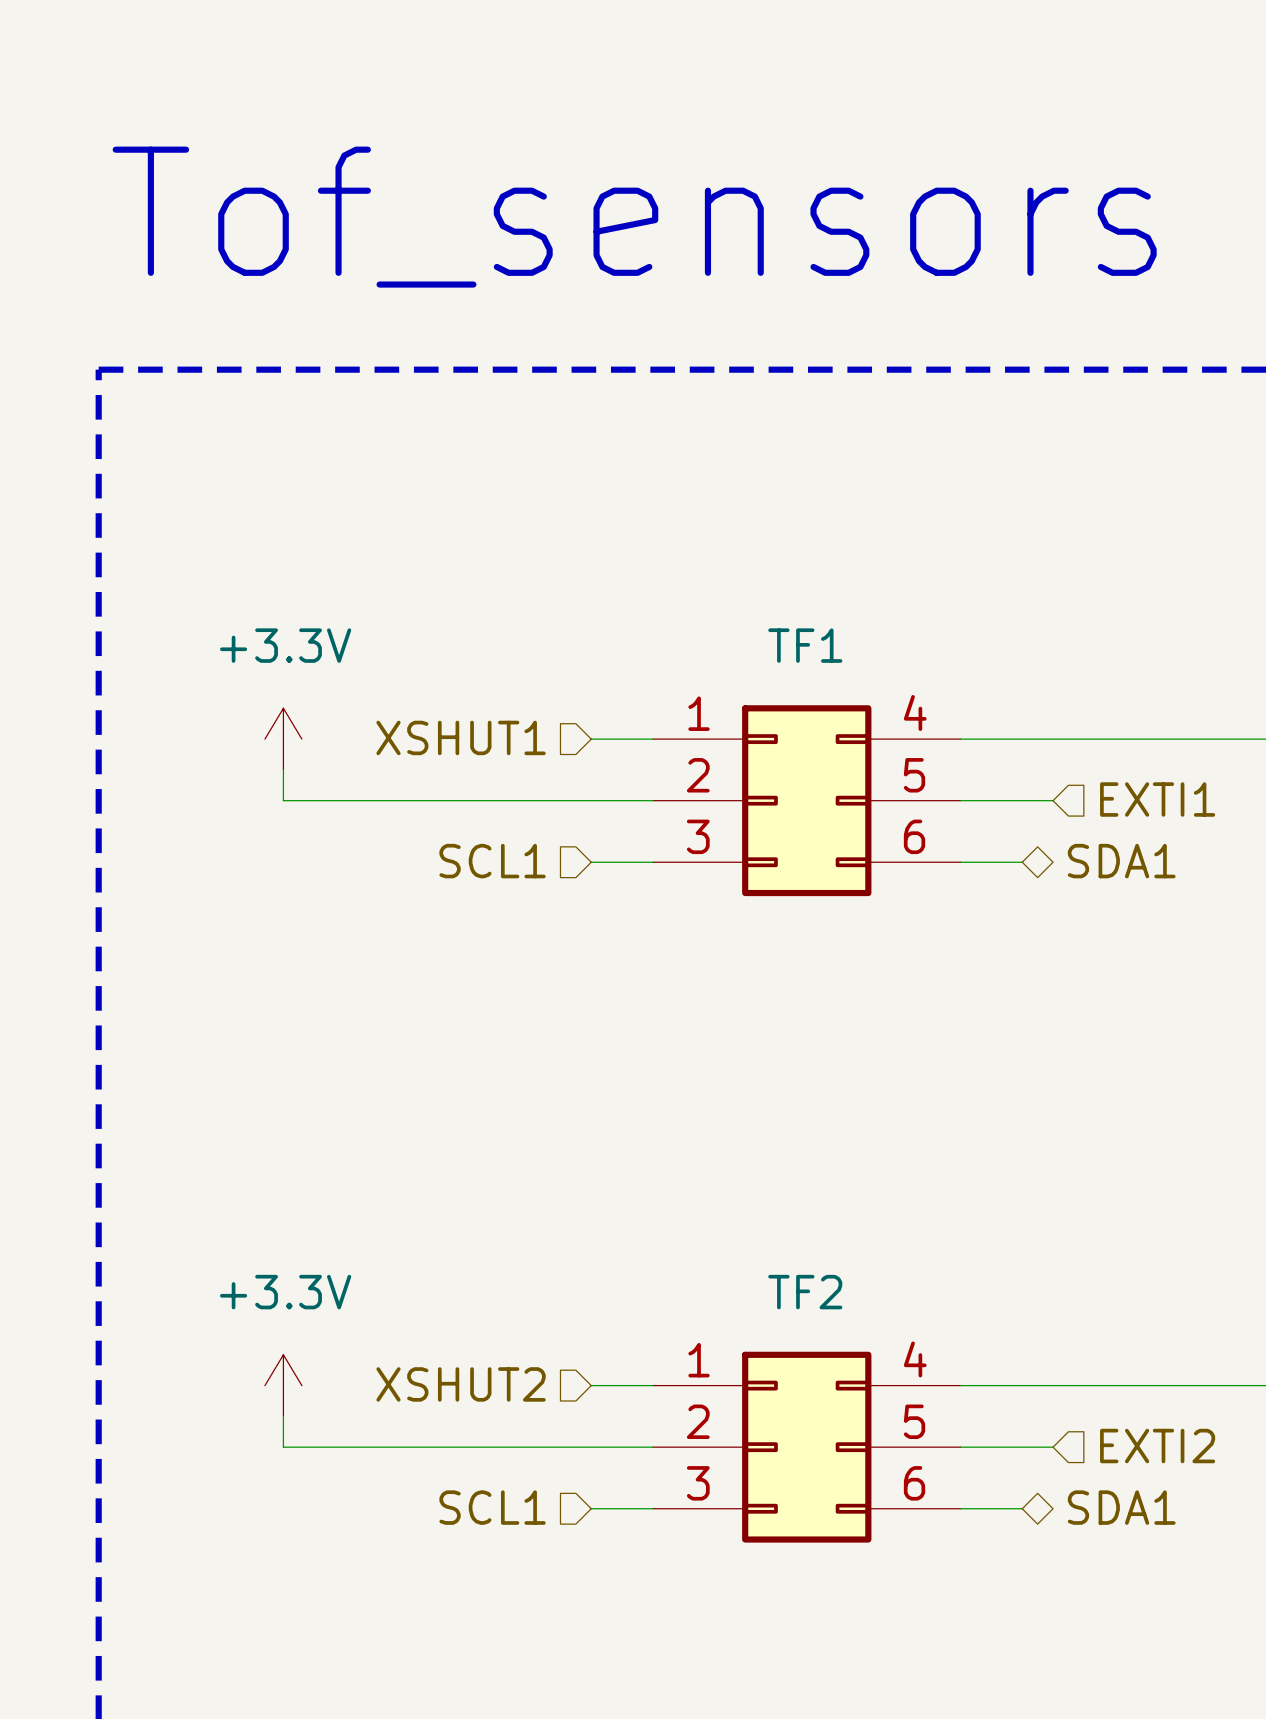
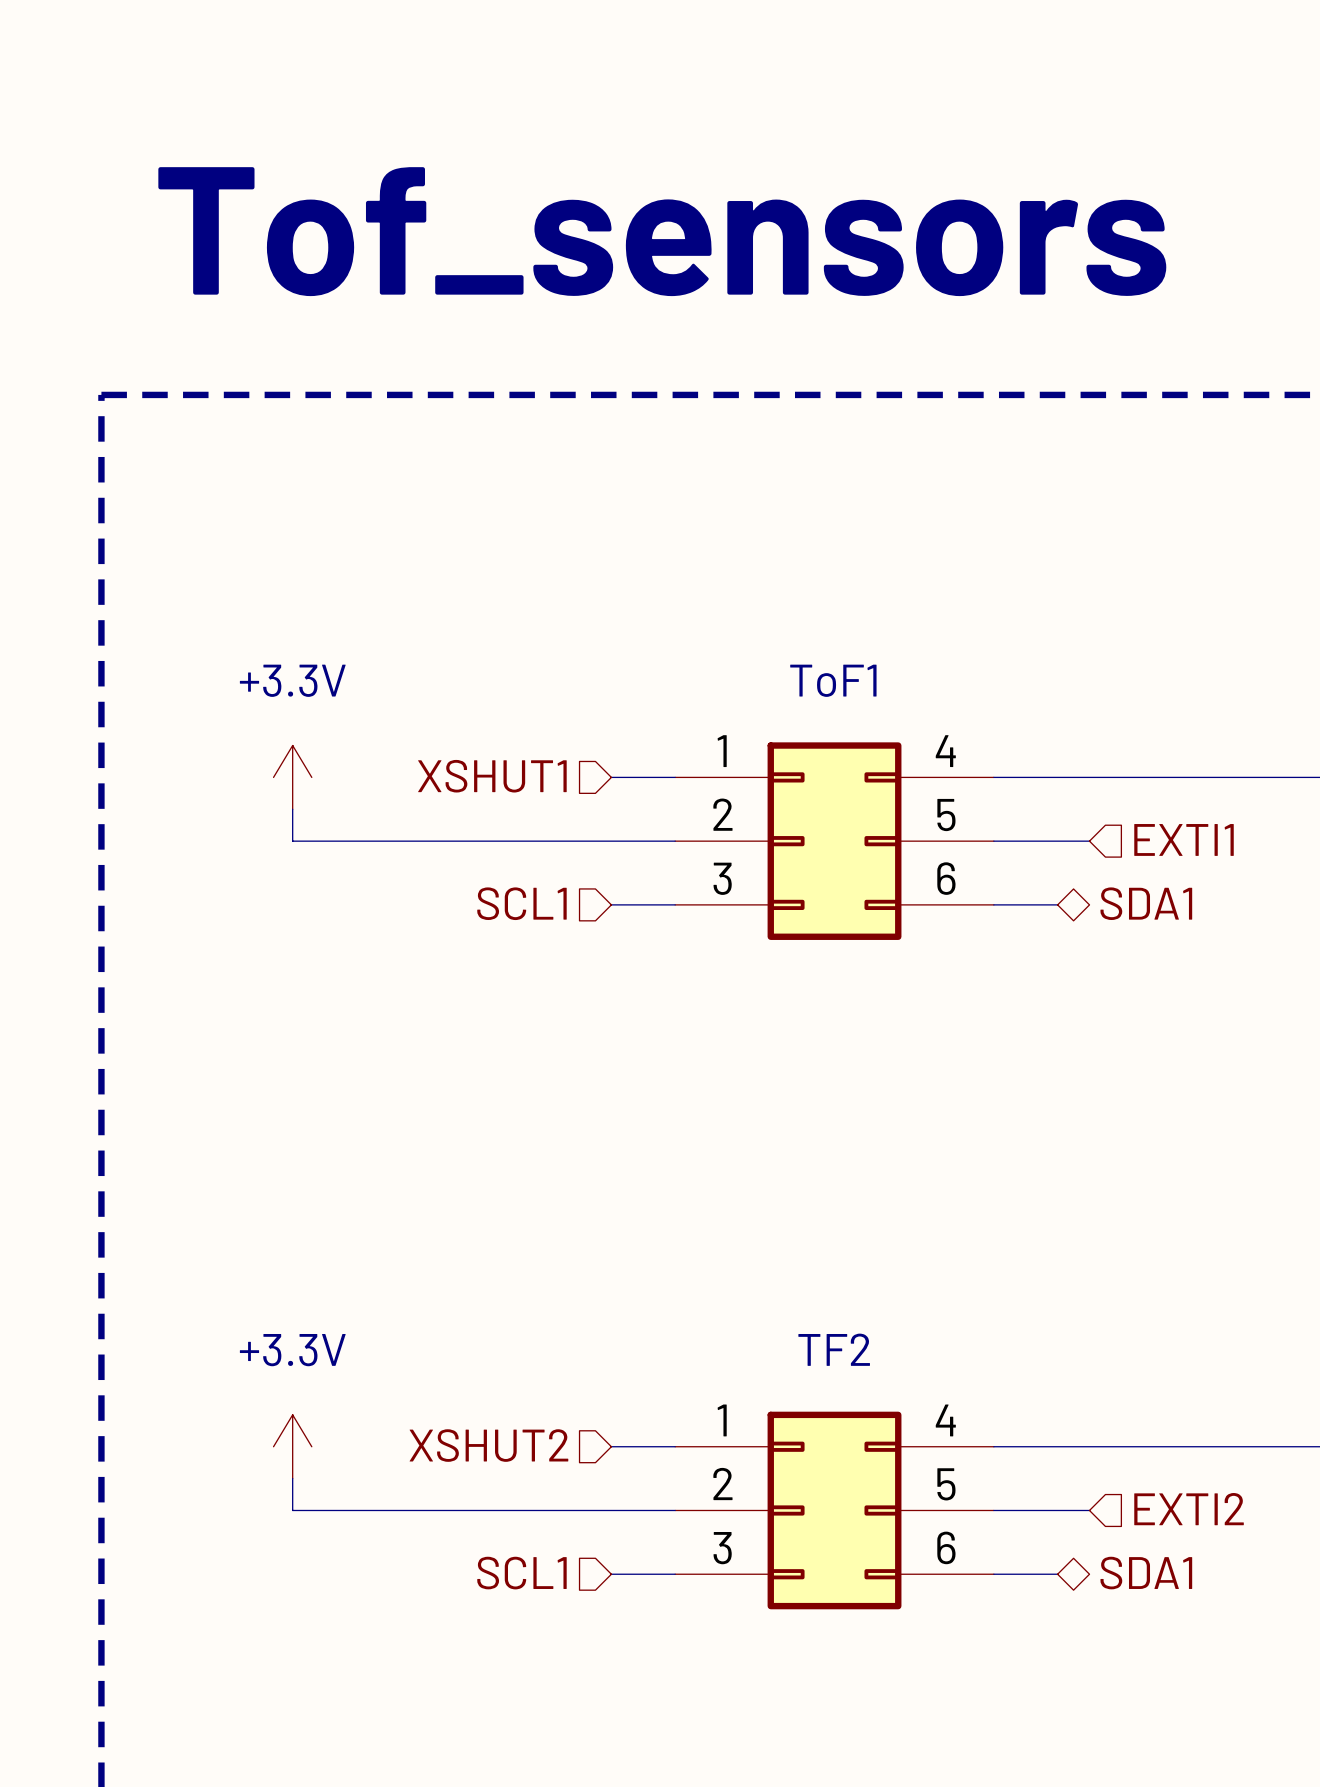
TF1 name: TF1 (805, 645) -> ToF1 (833, 680)

